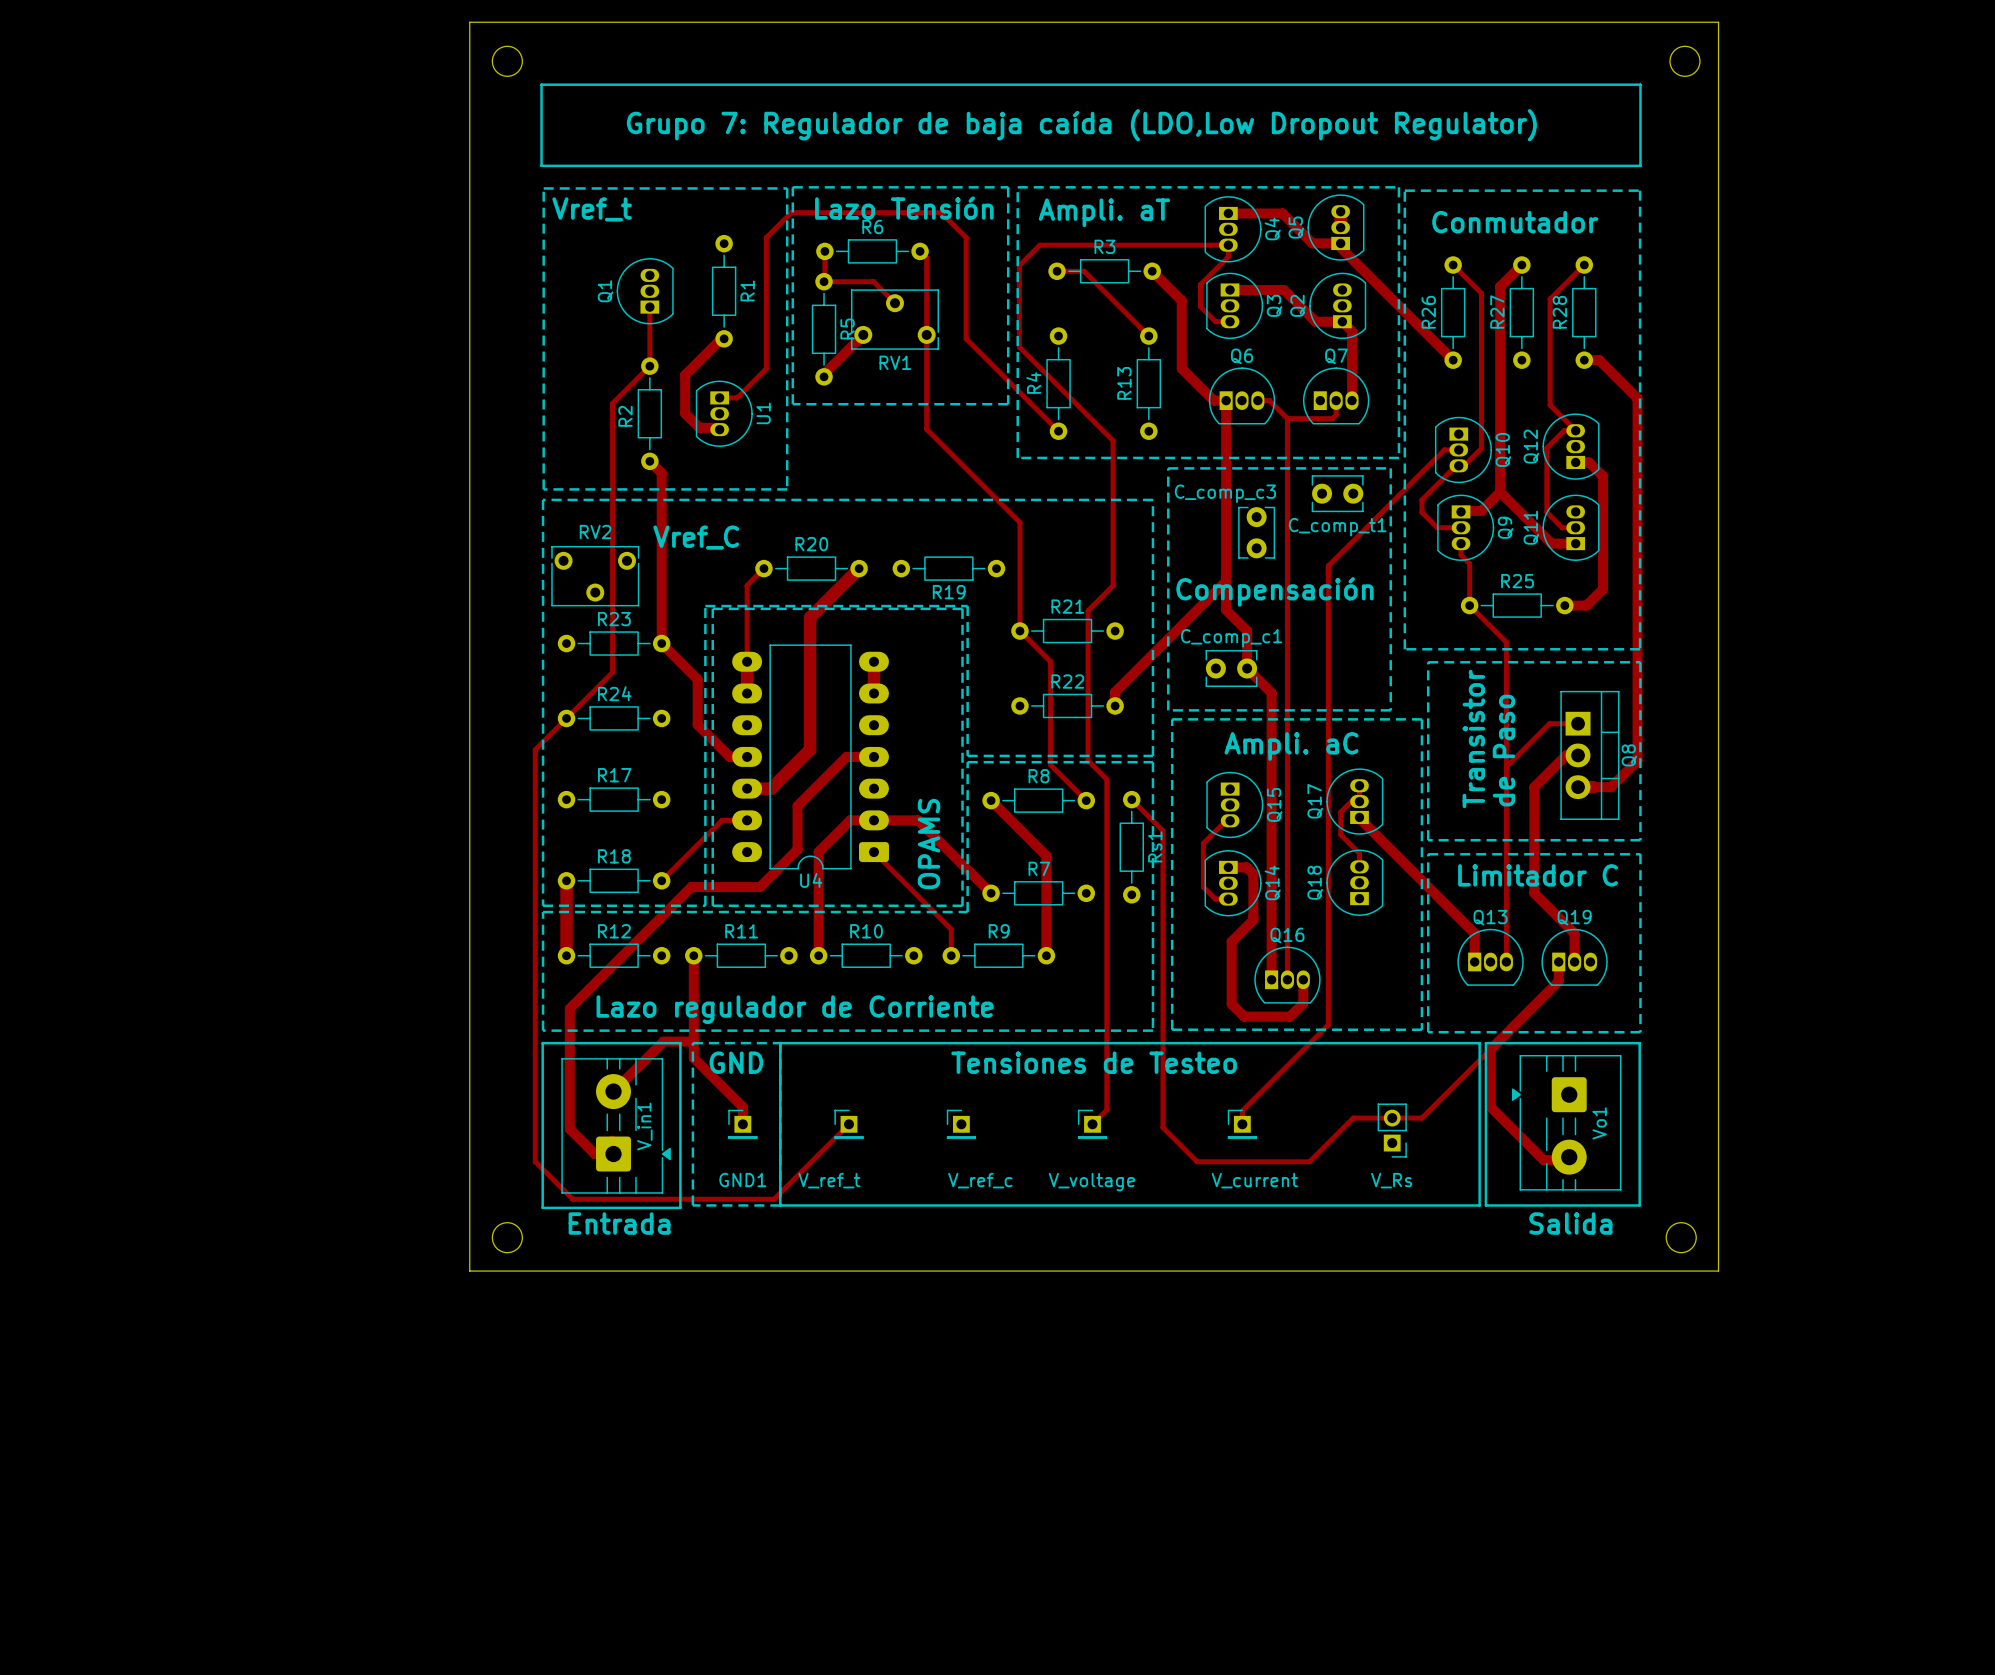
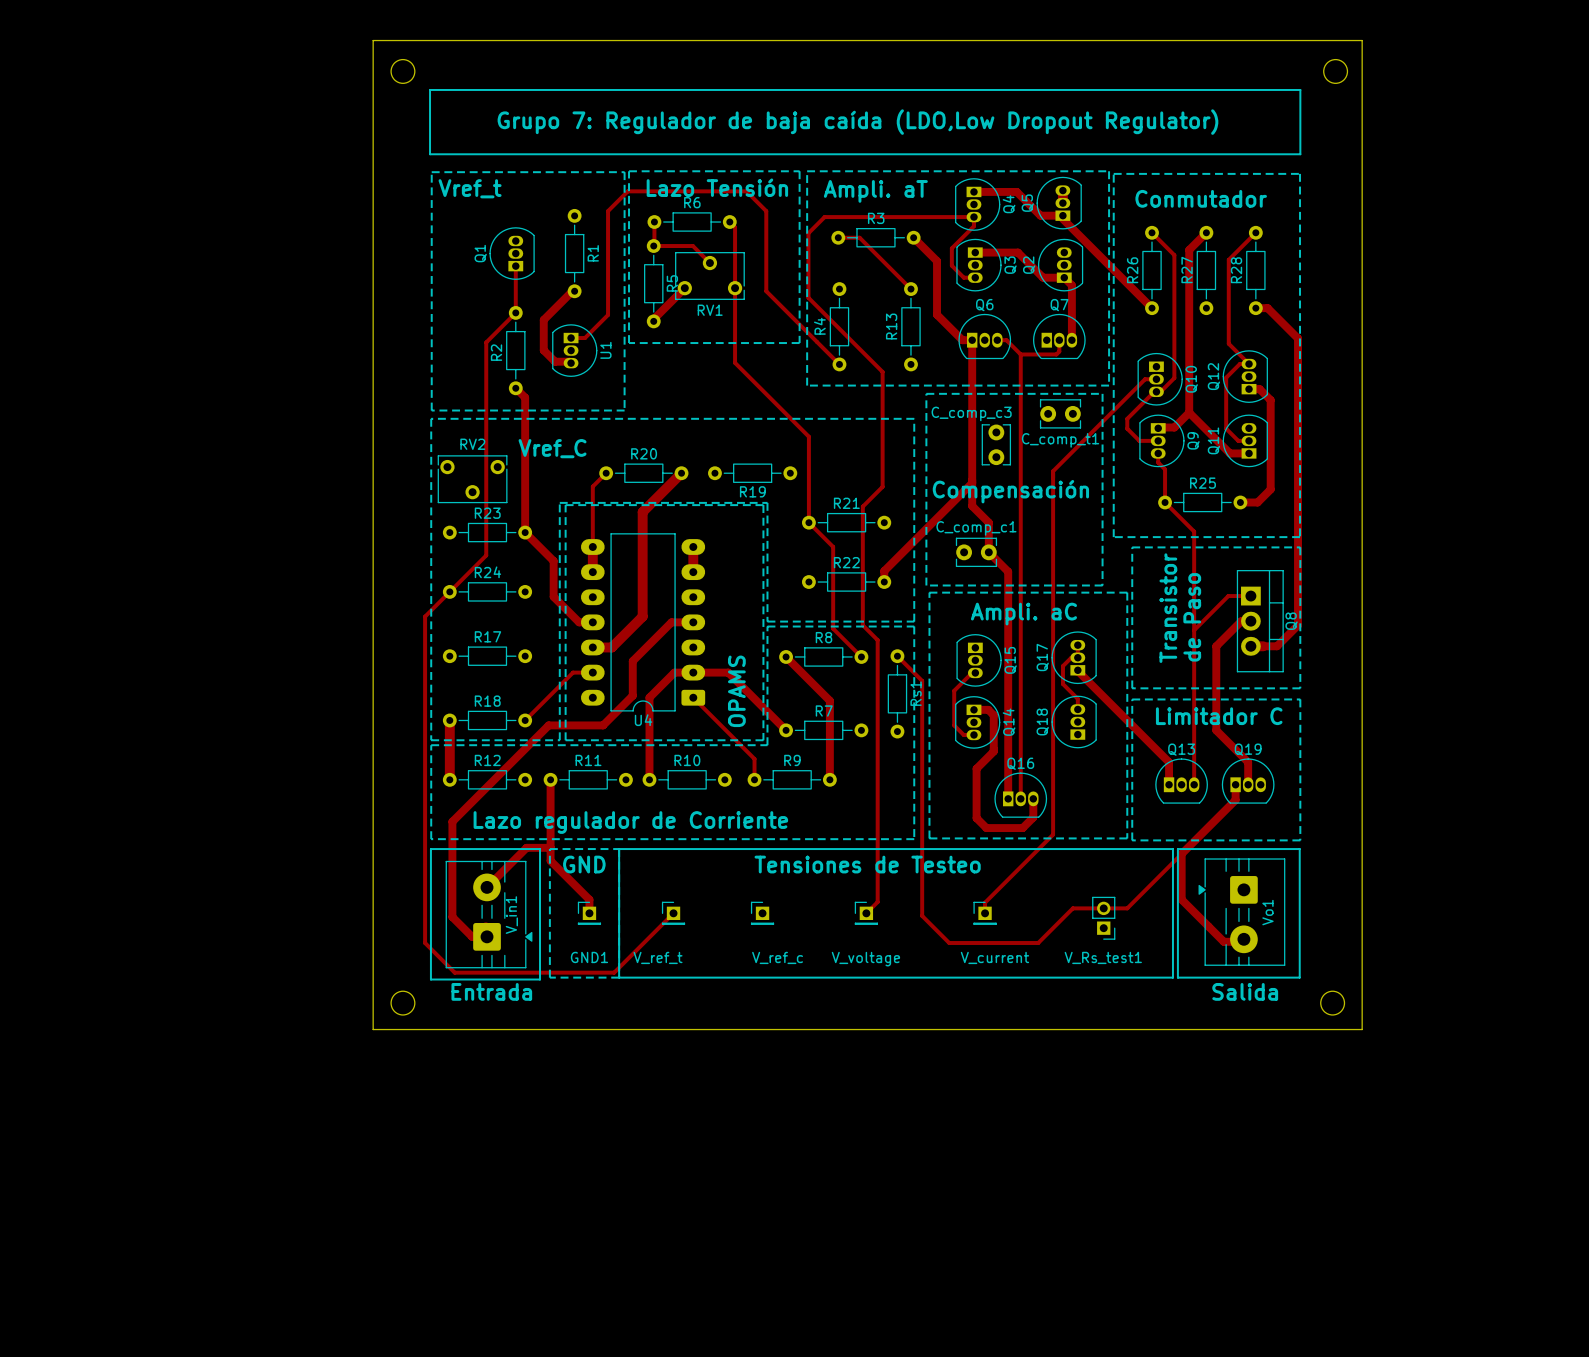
V_Rs name: V_Rs (1391, 1180) -> V_Rs_test1 (1103, 957)

